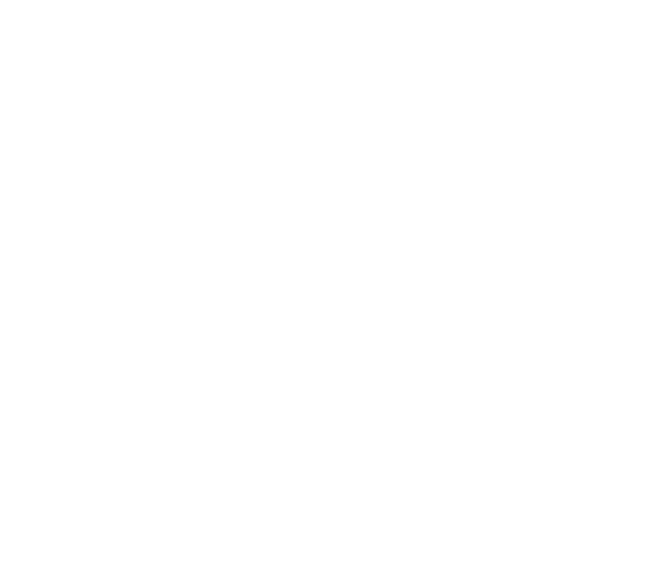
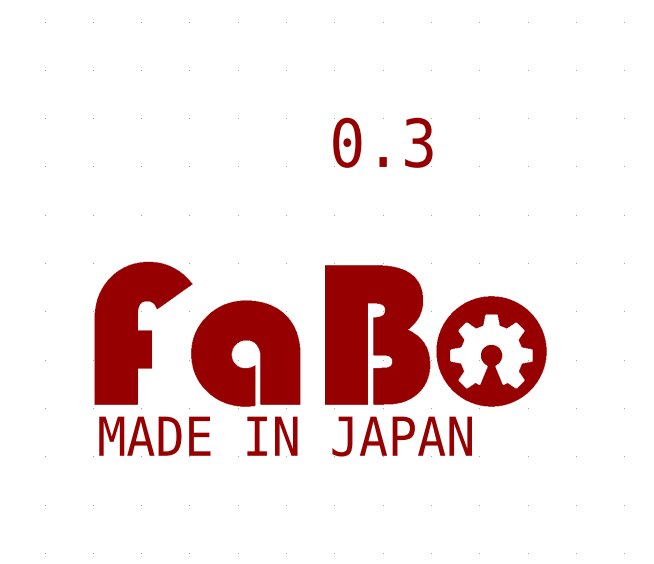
text: none -> 0.3 (382, 142)
part: none -> (320, 334)

